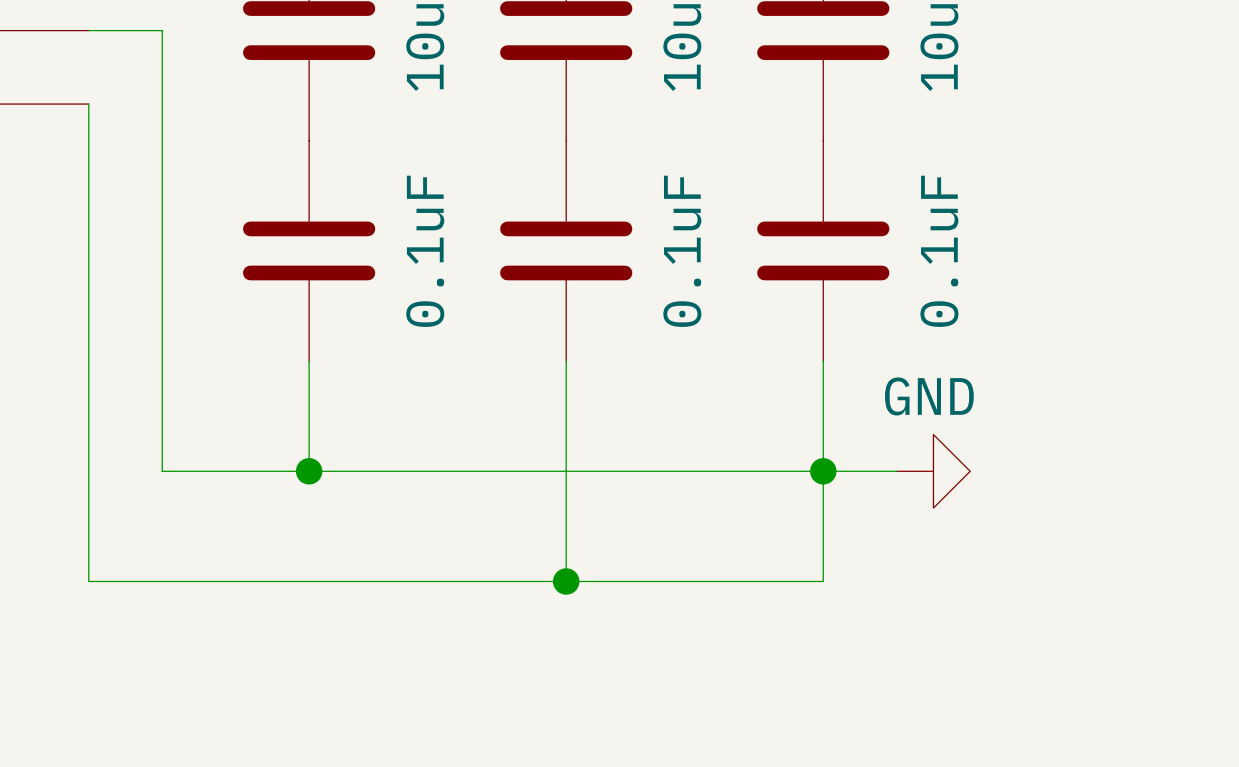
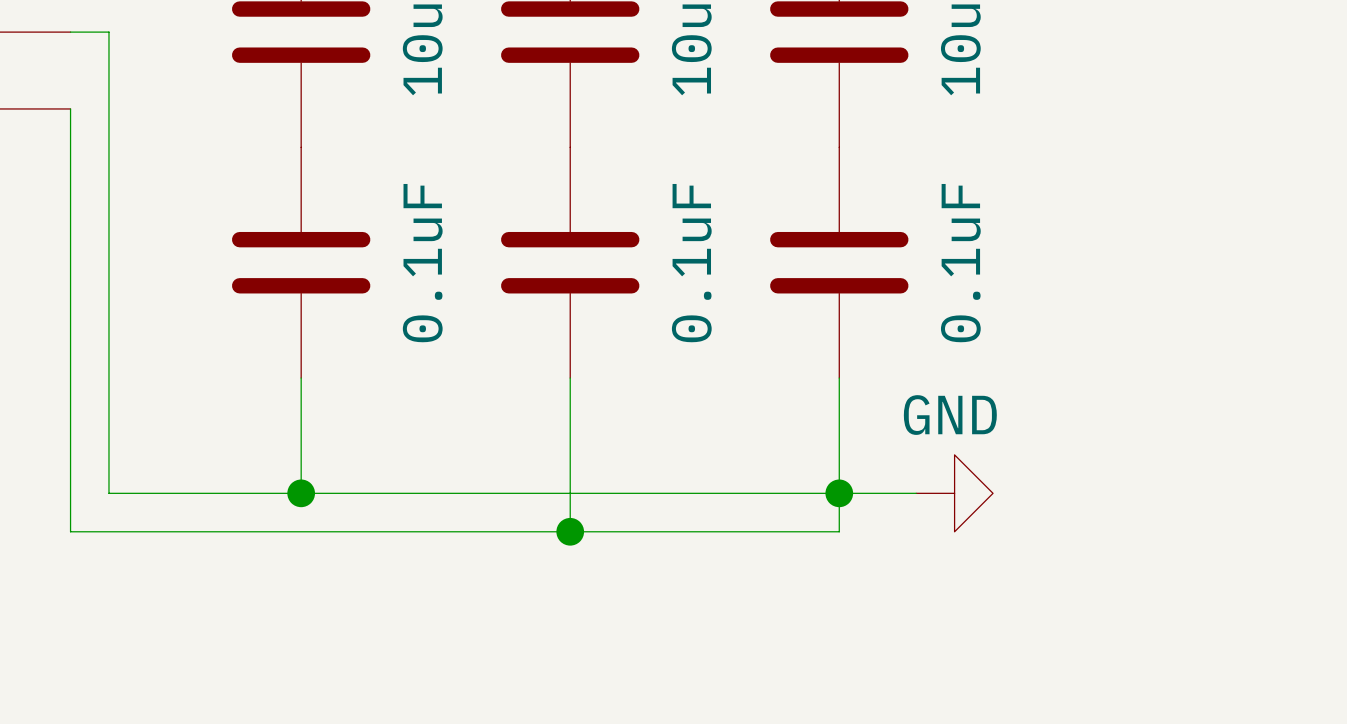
wire: (125, 30) (162, 30) (162, 471) -> (108, 32) (108, 493) (147, 493)
wire: (88, 508) (88, 581) (823, 581) (823, 508) -> (70, 531) (839, 531)
wire: (566, 508) (566, 581) -> none
junction position: (566, 581) -> (570, 531)

